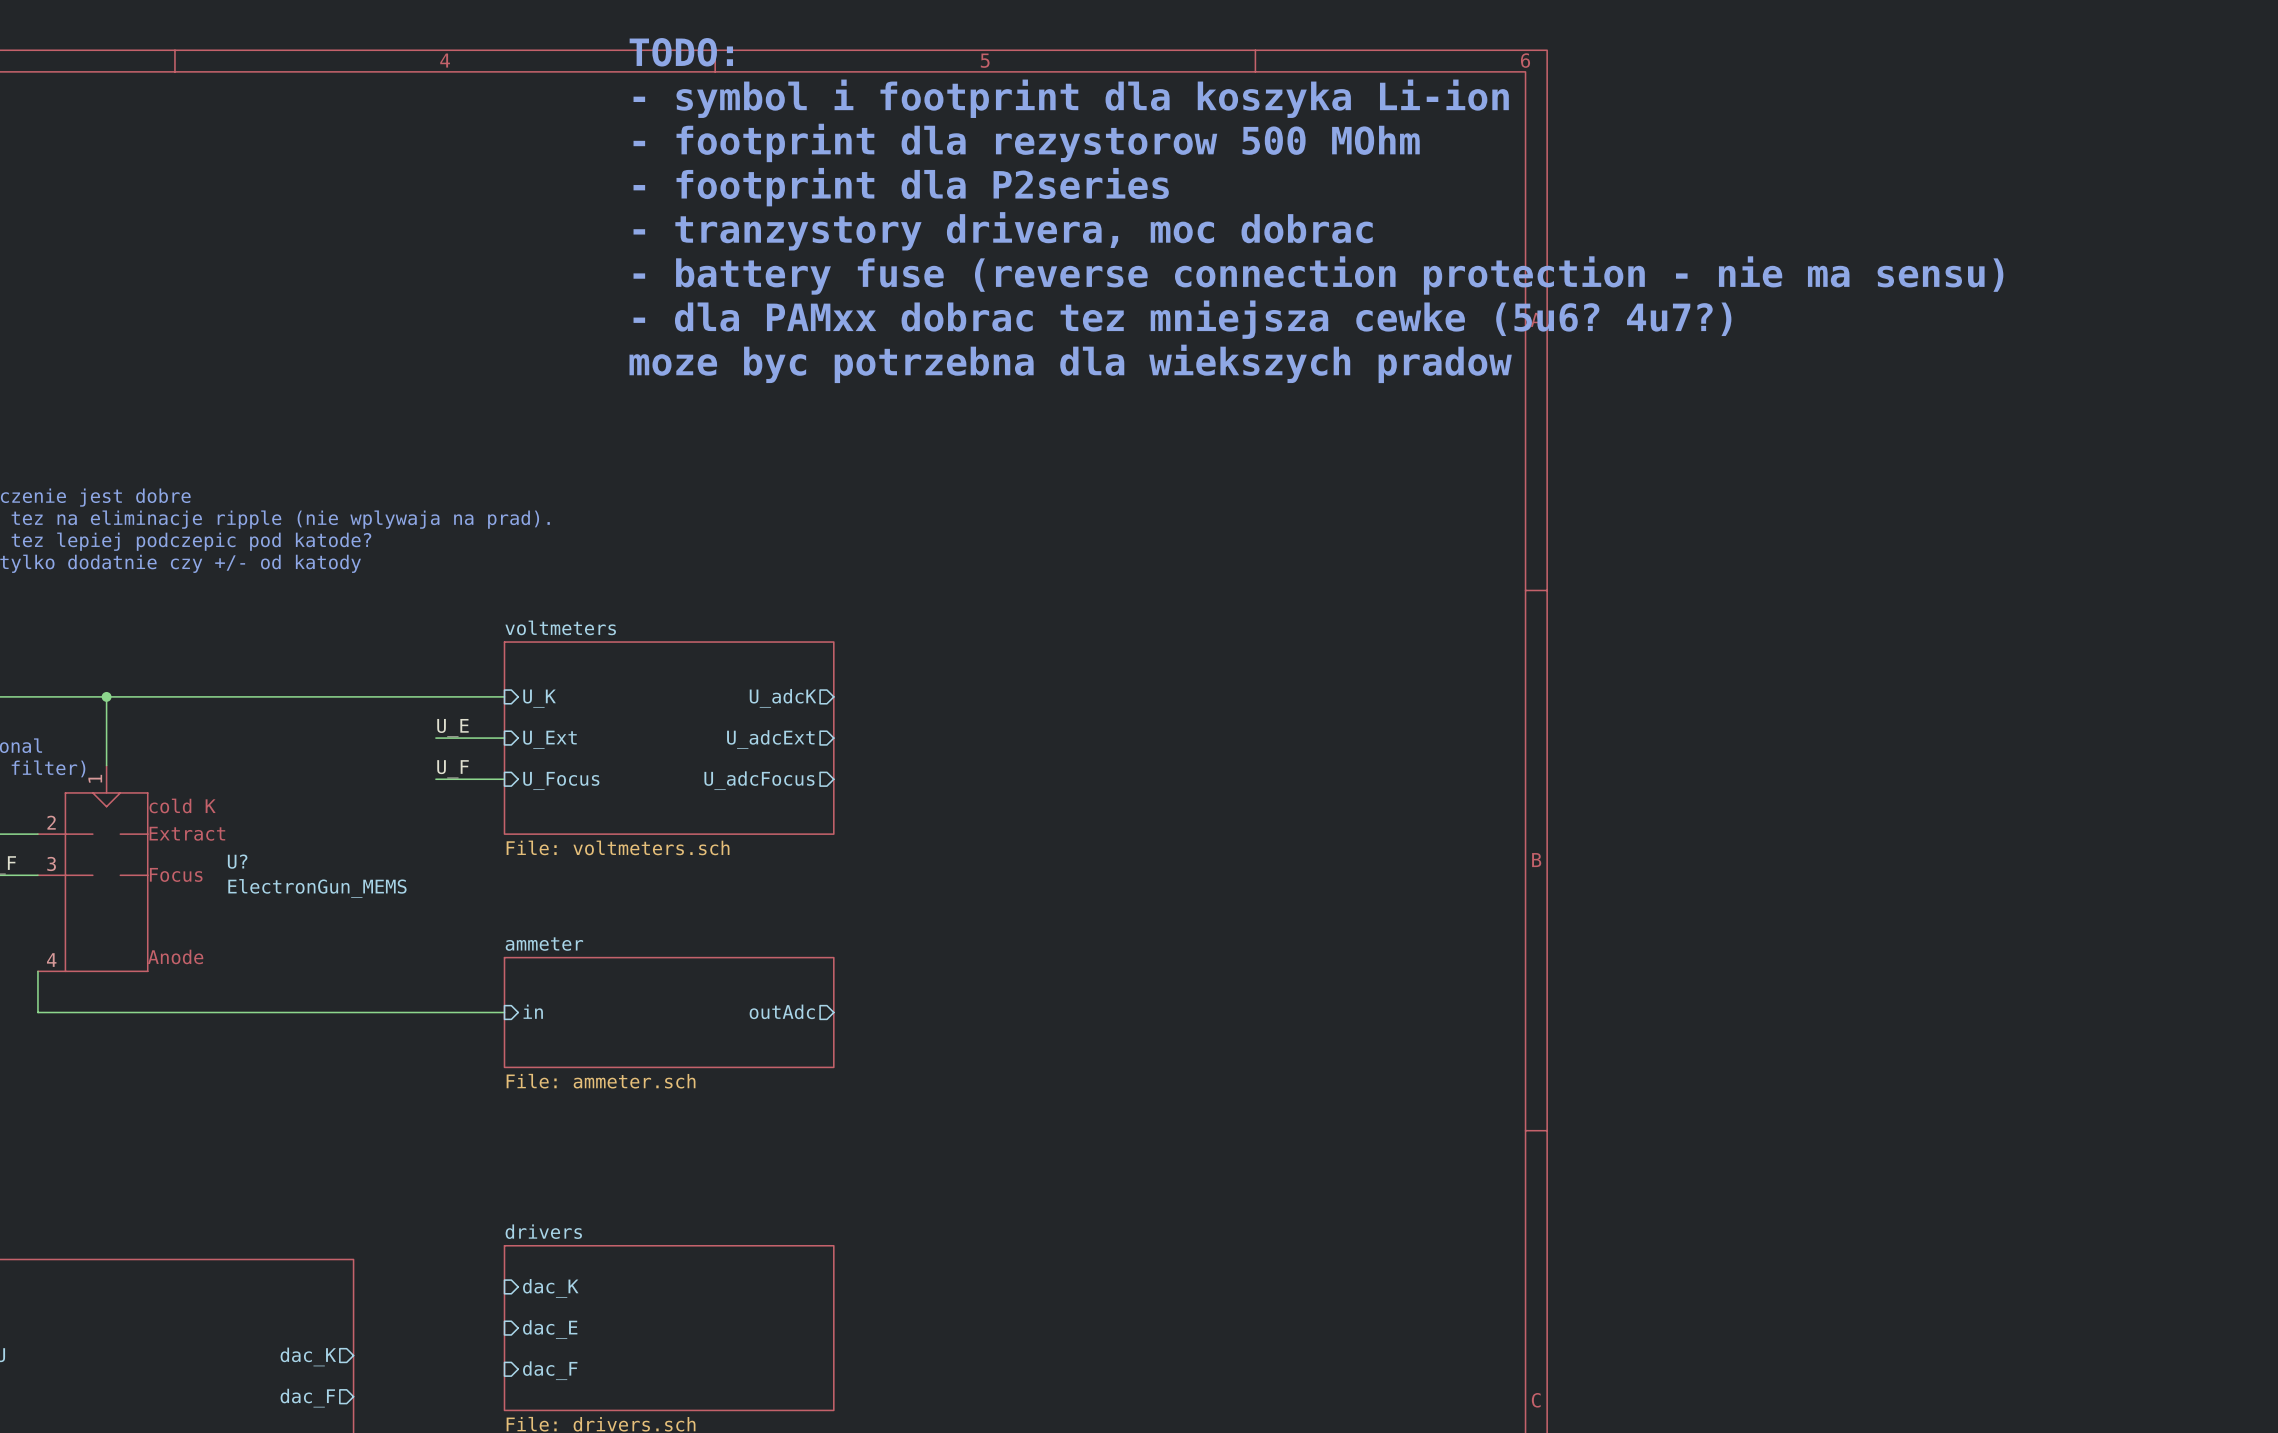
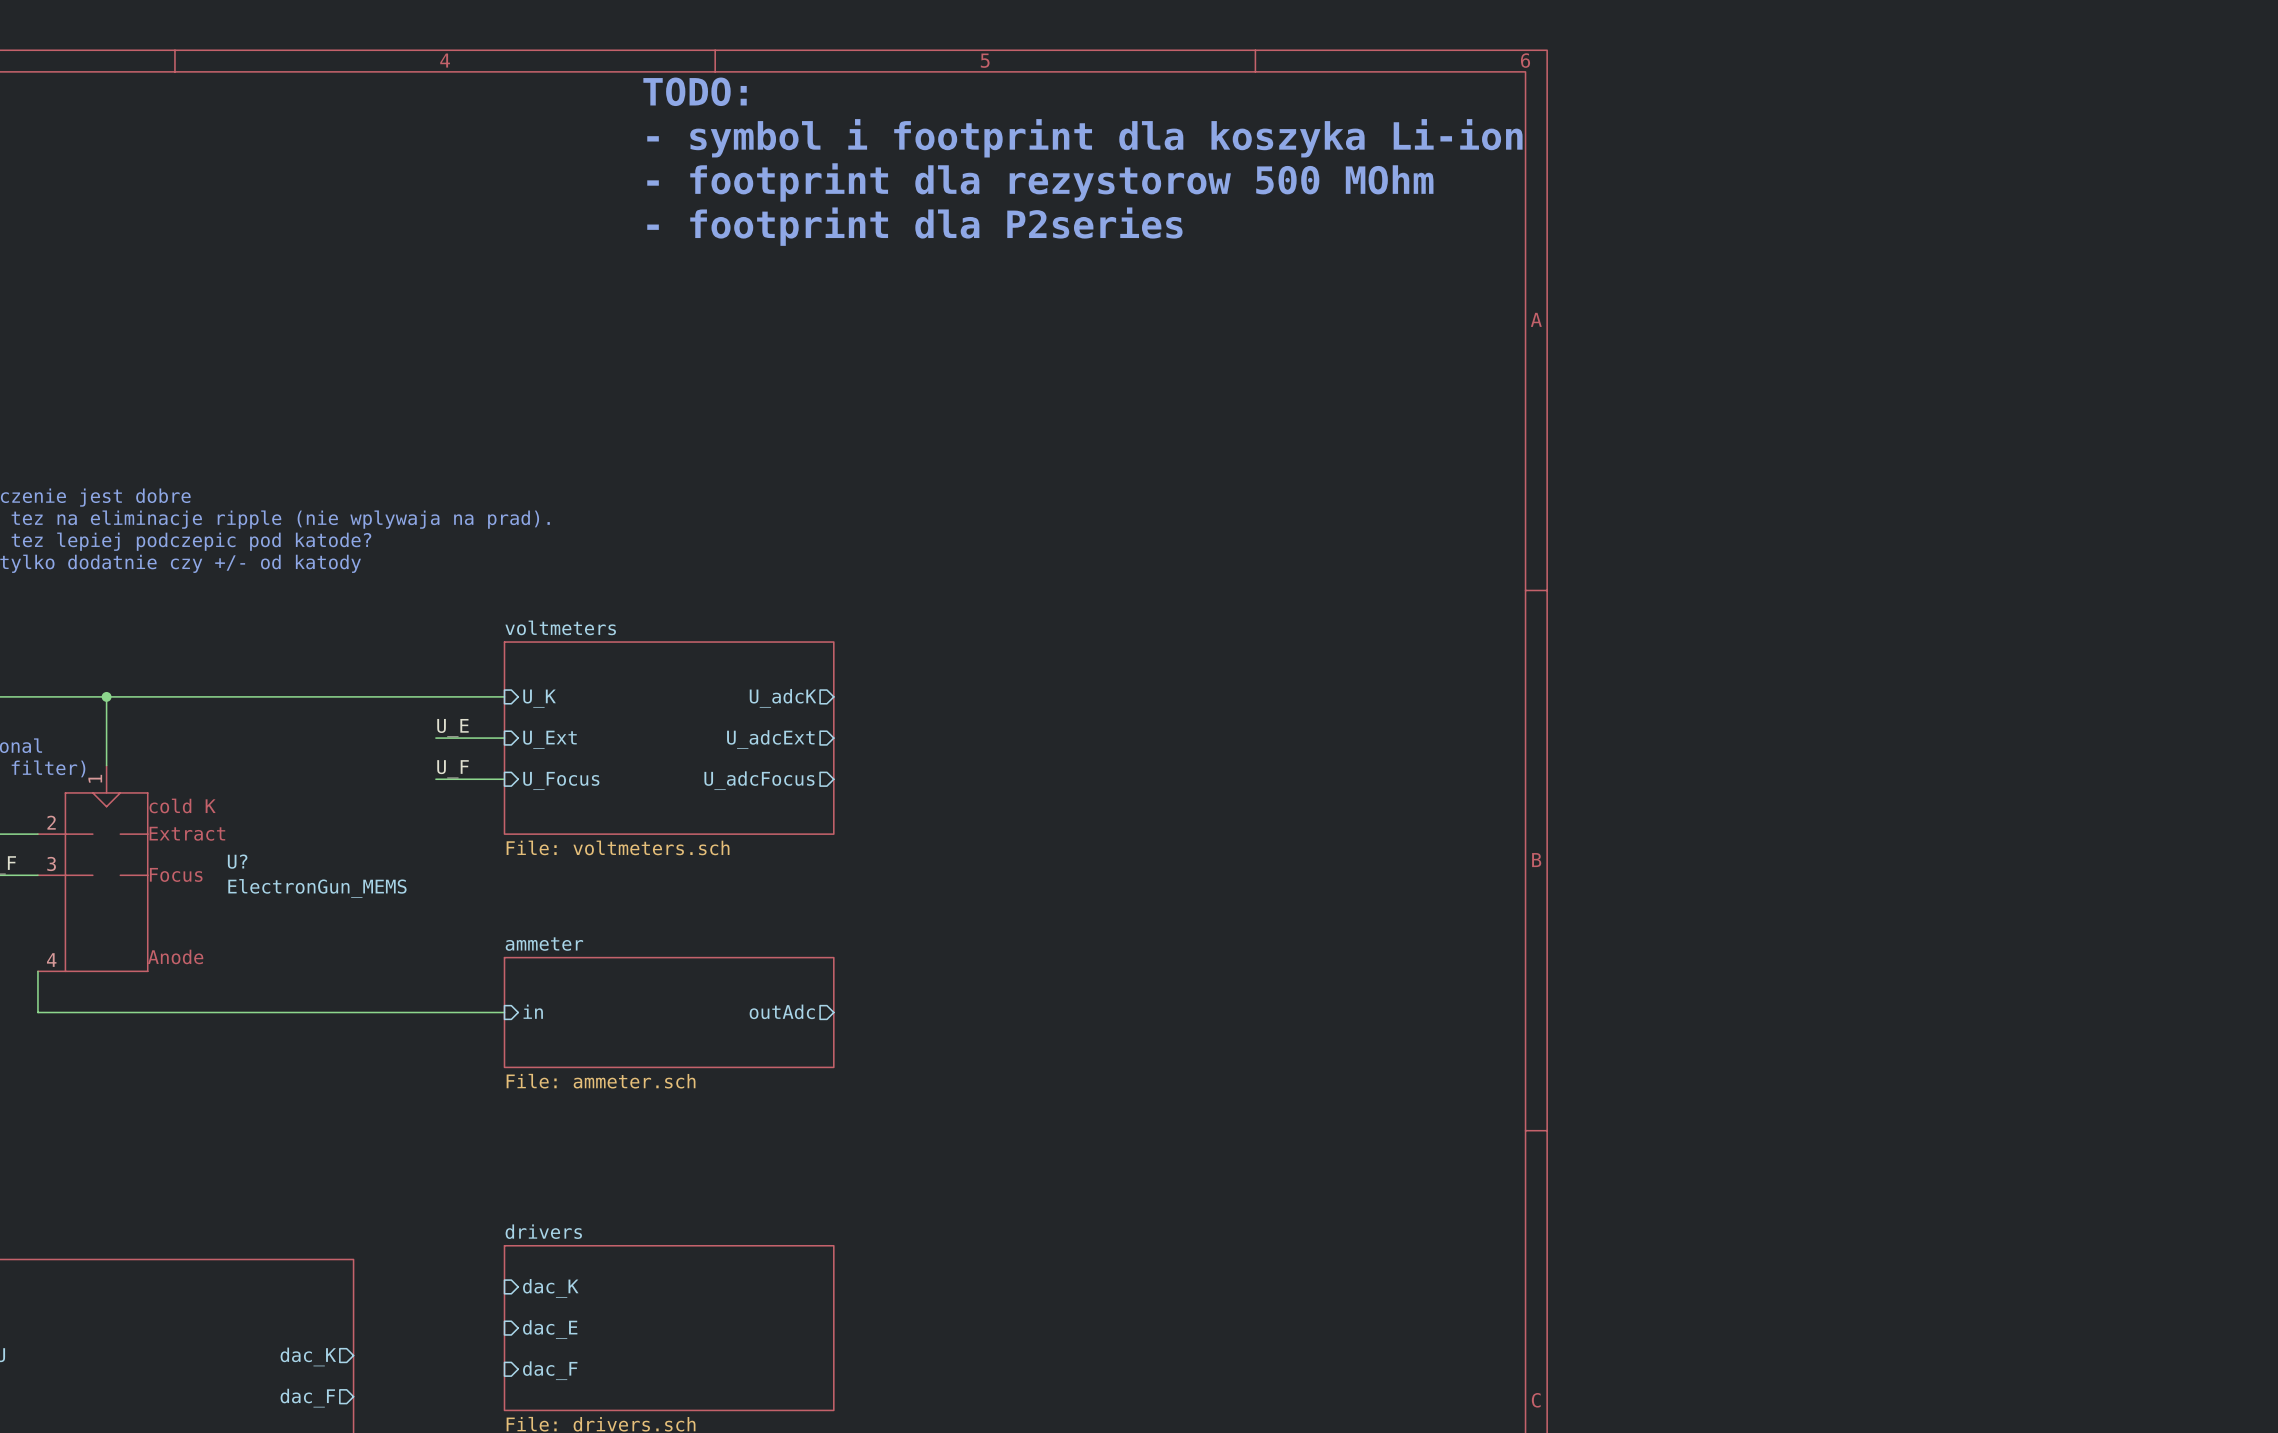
text position: TODO: (681, 52) -> TODO: (695, 91)
text position: - symbol i footprint dla koszyka Li-ion (1071, 98) -> - symbol i footprint dla koszyka Li-ion (1084, 138)
text position: - footprint dla rezystorow 500 MOhm (1026, 142) -> - footprint dla rezystorow 500 MOhm (1040, 182)
text position: - footprint dla P2series (901, 187) -> - footprint dla P2series (914, 226)
text: - tranzystory drivera, moc dobrac (1003, 231) -> none
text: - battery fuse (reverse connection protection - nie ma sensu) (1318, 275) -> none
text: - dla PAMxx dobrac tez mniejsza cewke (5u6? 4u7?) (1182, 319) -> none
text: moze byc potrzebna dla wiekszych pradow (1070, 363) -> none

